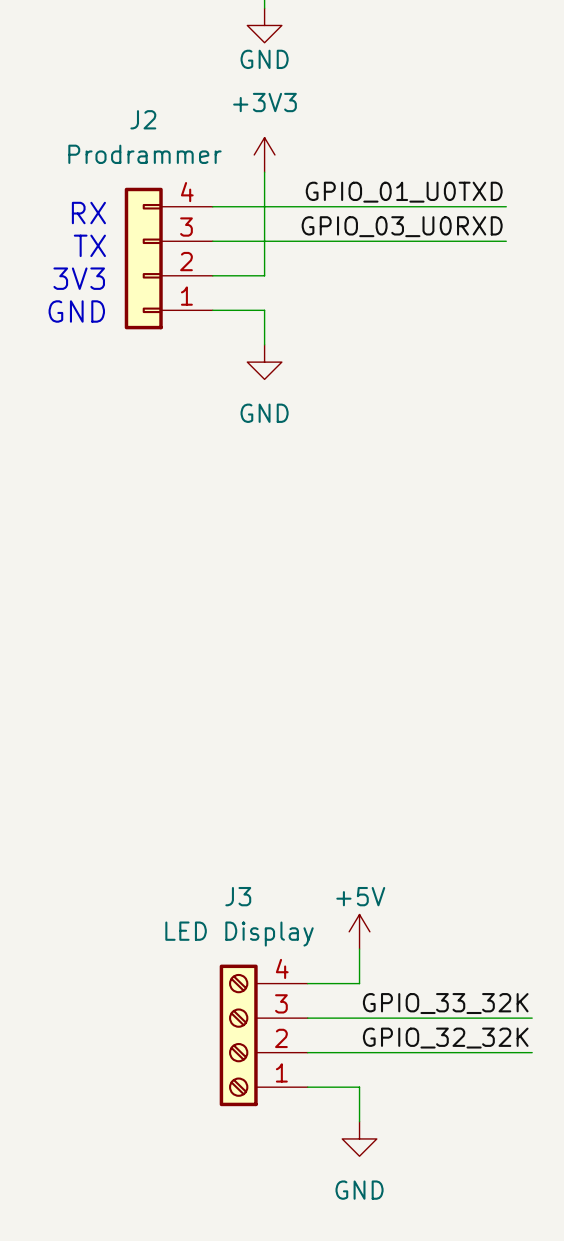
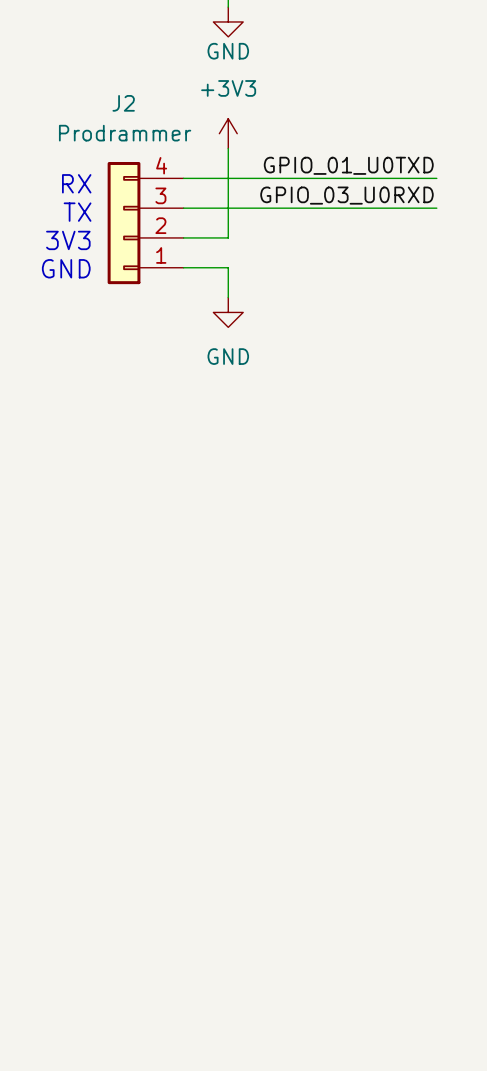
power symbol: +5V (359, 931) -> none
wire: (359, 949) (359, 983) (307, 983) -> none
label: GPIO_33_32K (445, 1003) -> none
wire: (307, 1018) (532, 1018) -> none
J3: LED Display (263, 1035) -> none
label: GPIO_32_32K (445, 1038) -> none
wire: (307, 1052) (532, 1052) -> none
wire: (307, 1087) (359, 1087) (359, 1121) -> none
power symbol: GND (359, 1138) -> none

